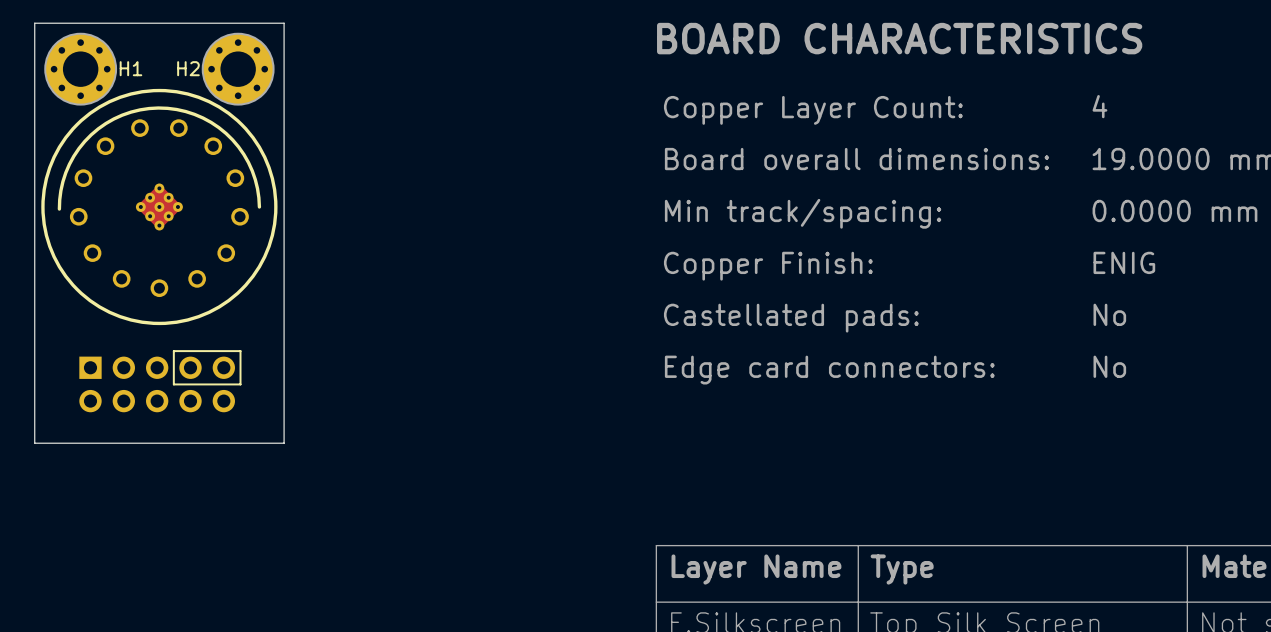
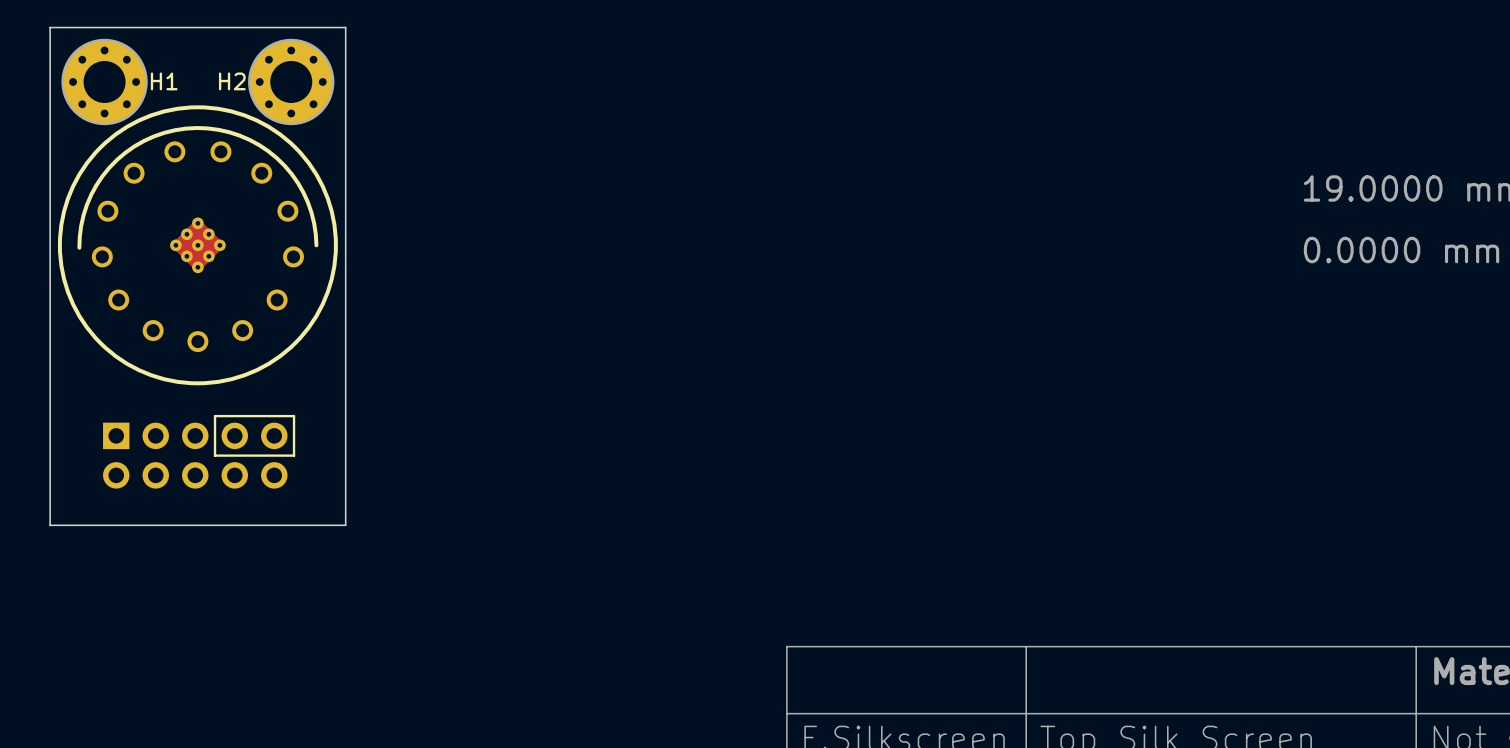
text: BOARD CHARACTERISTICS (899, 38) -> none
text: 4 (1099, 106) -> none
text: Copper Layer Count: (813, 110) -> none
text: Board overall dimensions: (856, 159) -> none
text: Min track/spacing: (803, 213) -> none
text: ENIG (1124, 262) -> none
text: Copper Finish: (768, 266) -> none
text: No (1109, 314) -> none
text: Castellated pads: (791, 318) -> none
text: No (1109, 366) -> none
text: Edge card connectors: (829, 370) -> none
text: Layer Name (756, 569) -> none
text: Type (902, 569) -> none

